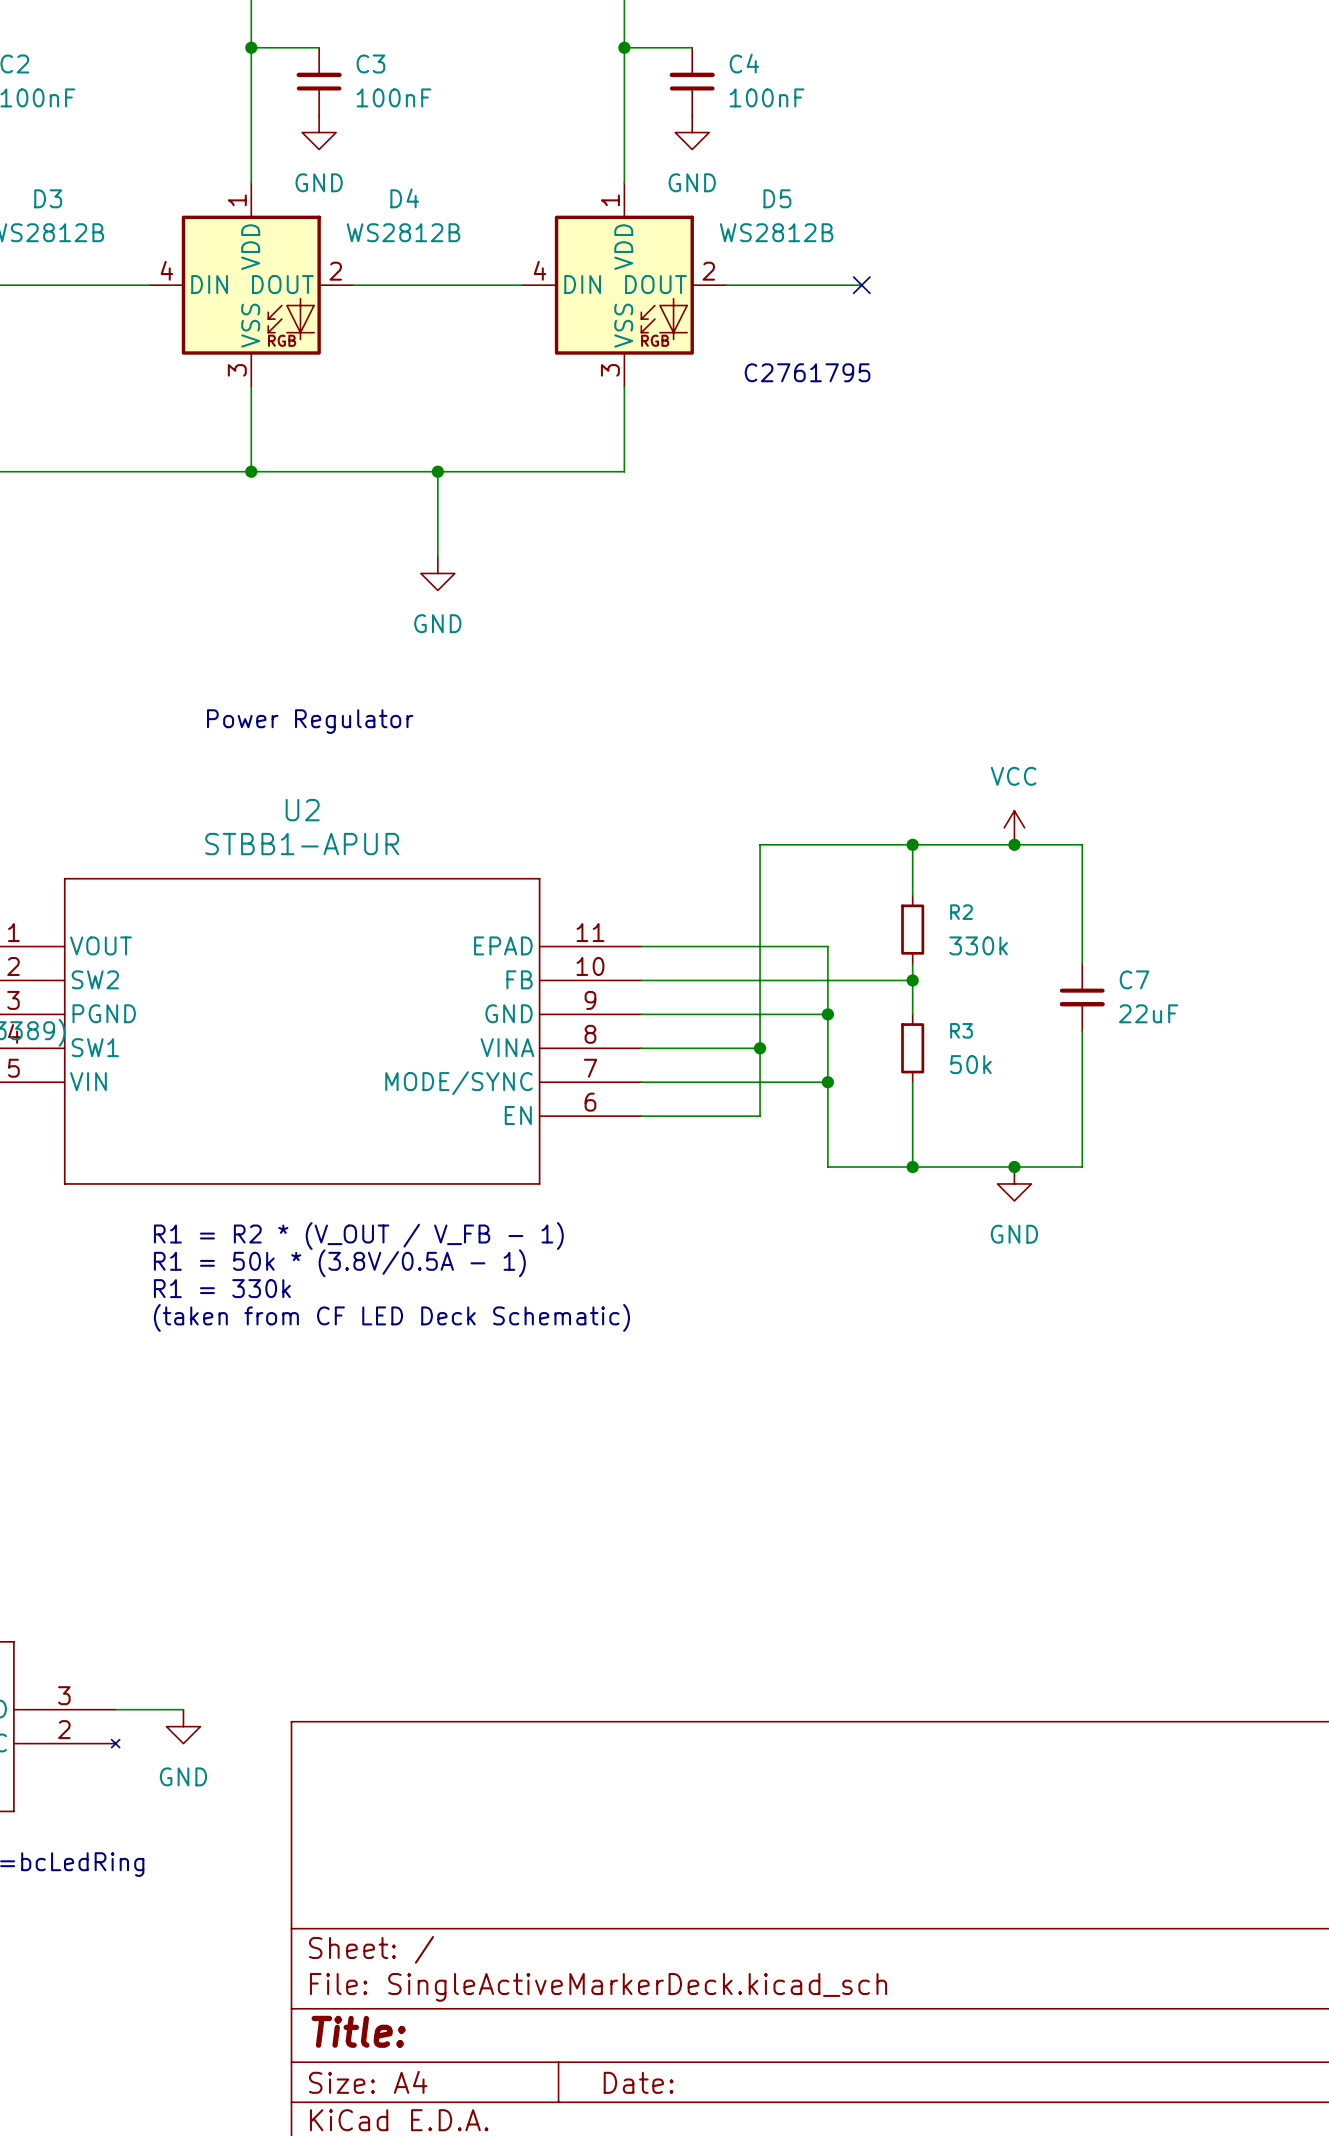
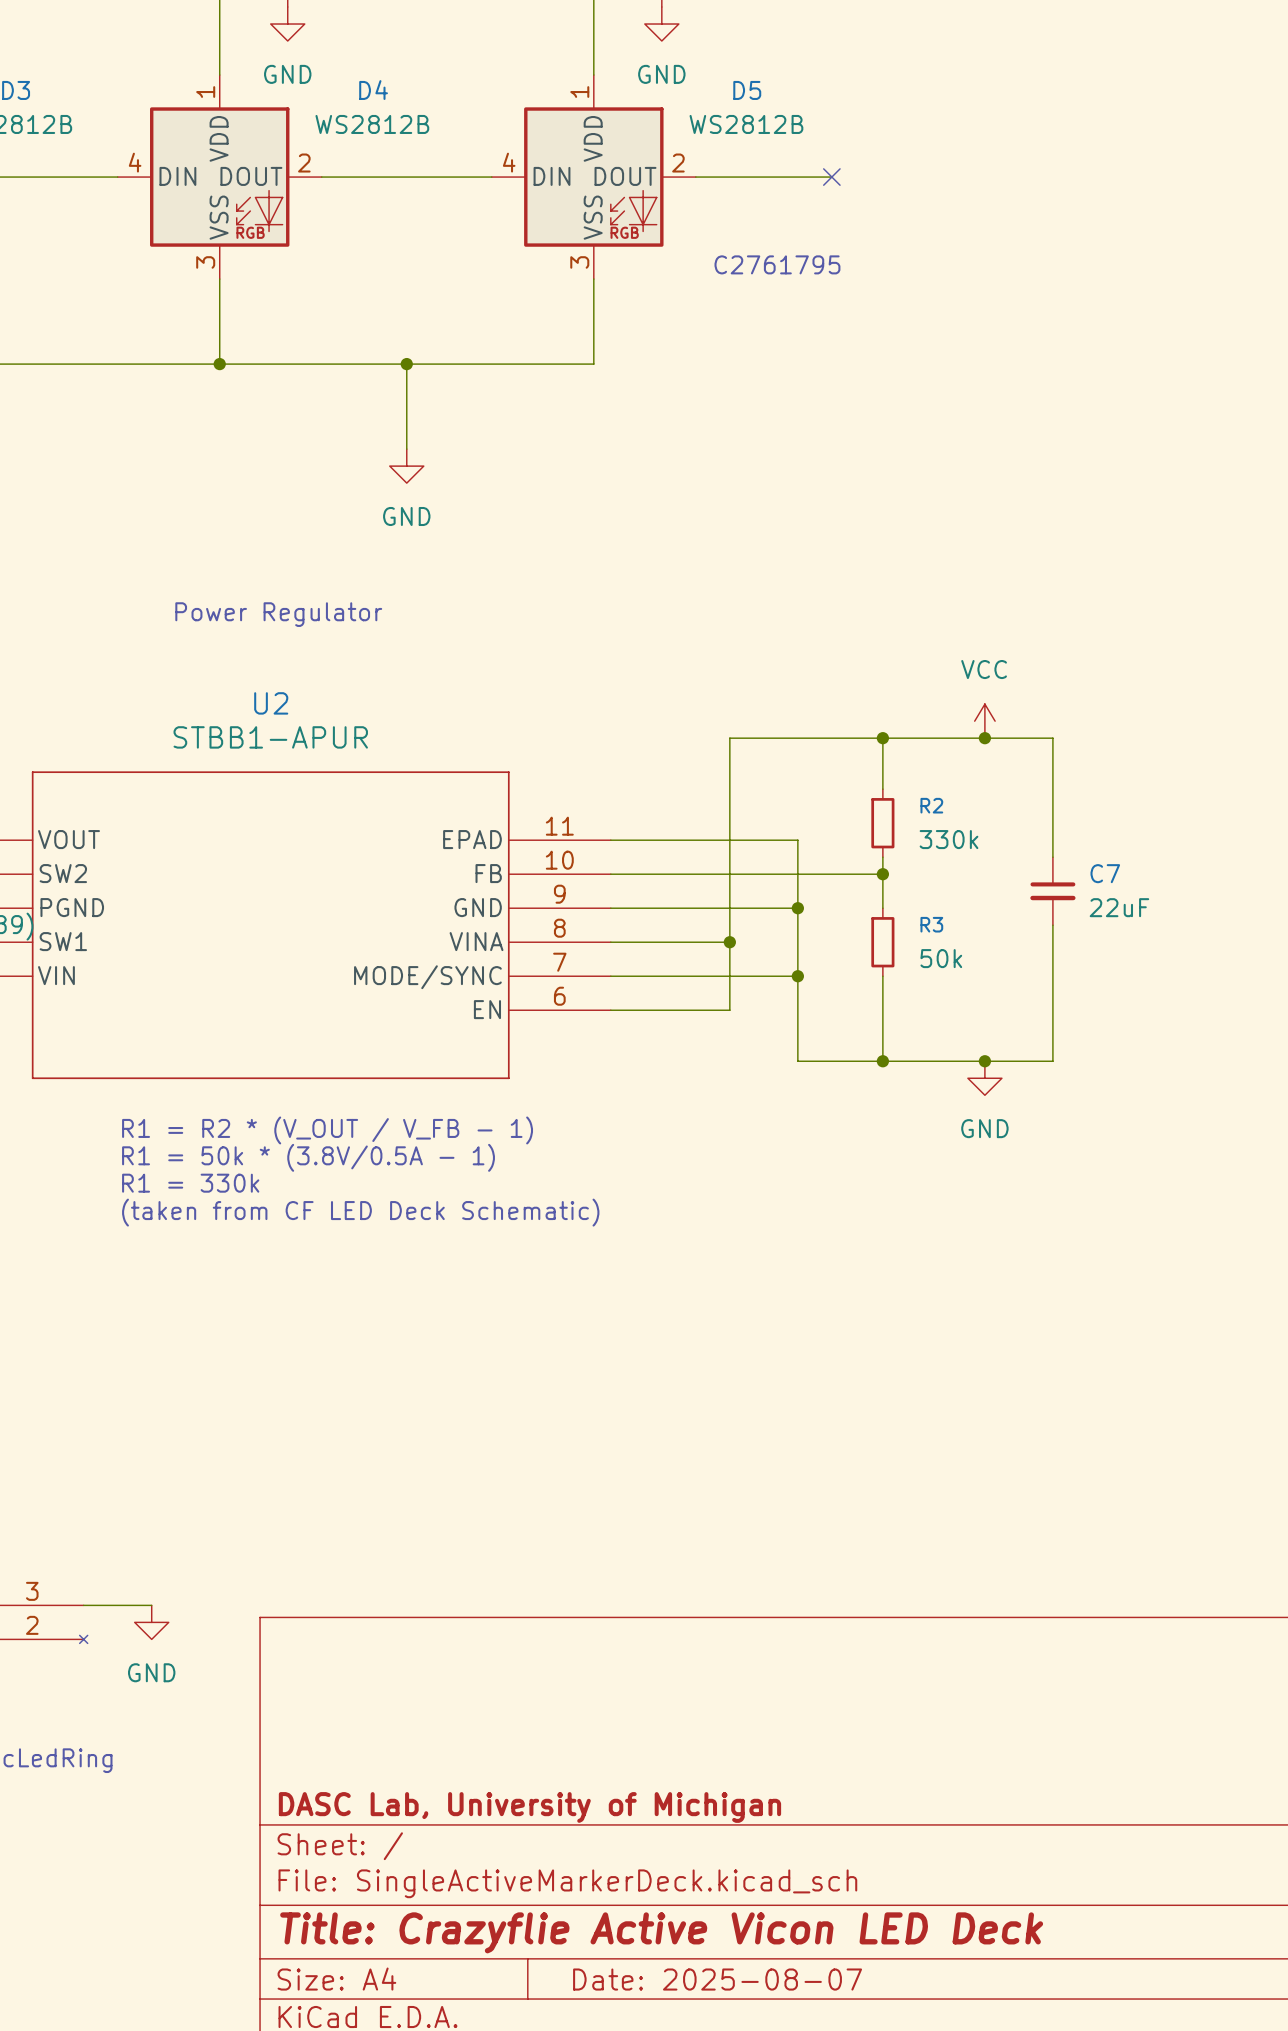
title block: none -> DASC Lab, University of Michigan (529, 1807)
title block: Title: (358, 2031) -> Title: Crazyflie Active Vicon LED Deck (661, 1932)
title block: Date: (638, 2082) -> Date: 2025-08-07 (717, 1979)

